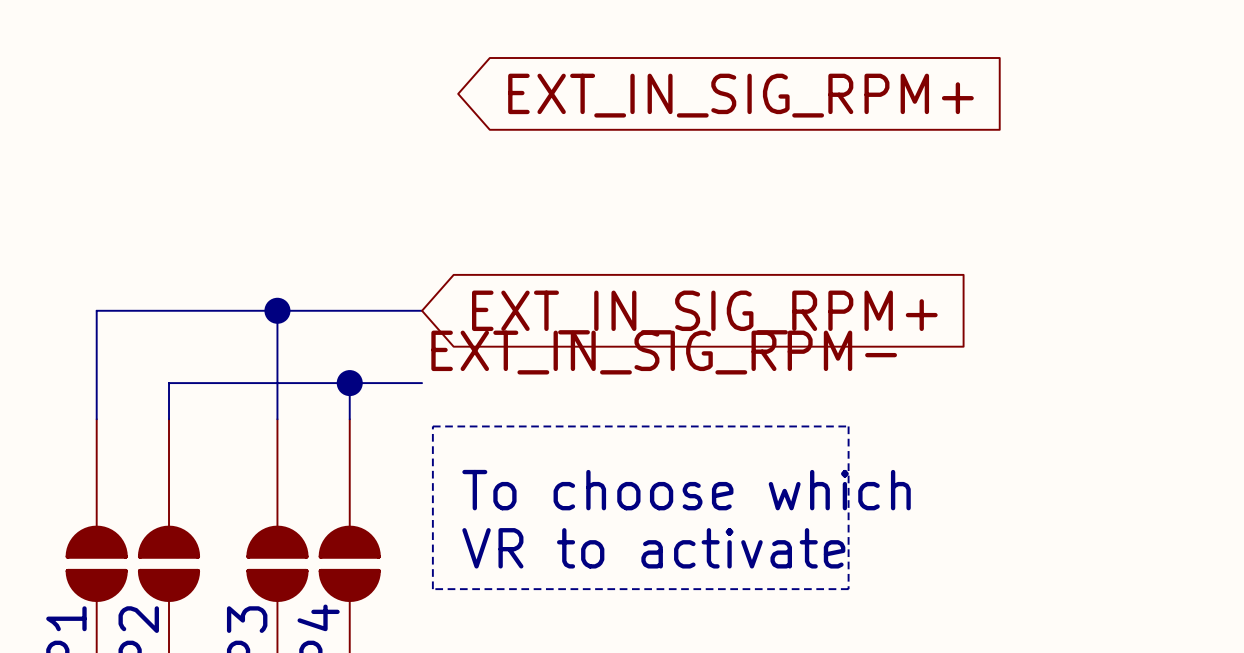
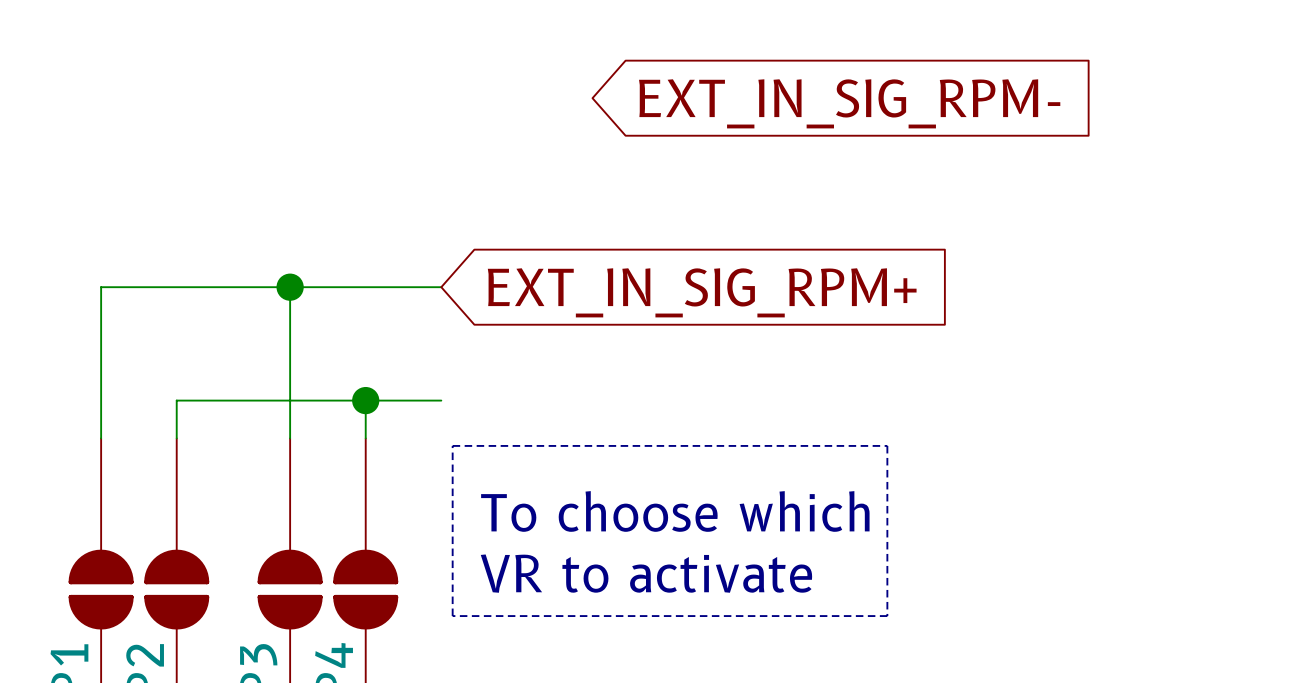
global label: EXT_IN_SIG_RPM+ (740, 95) -> EXT_IN_SIG_RPM- (849, 103)
wire: none -> (290, 287) (290, 324)
wire: (96, 310) (422, 310) -> (101, 324) (101, 287) (441, 287)
junction position: (277, 310) -> (290, 287)
global label position: EXT_IN_SIG_RPM+ (704, 312) -> EXT_IN_SIG_RPM+ (702, 292)
label: EXT_IN_SIG_RPM- (664, 352) -> none

